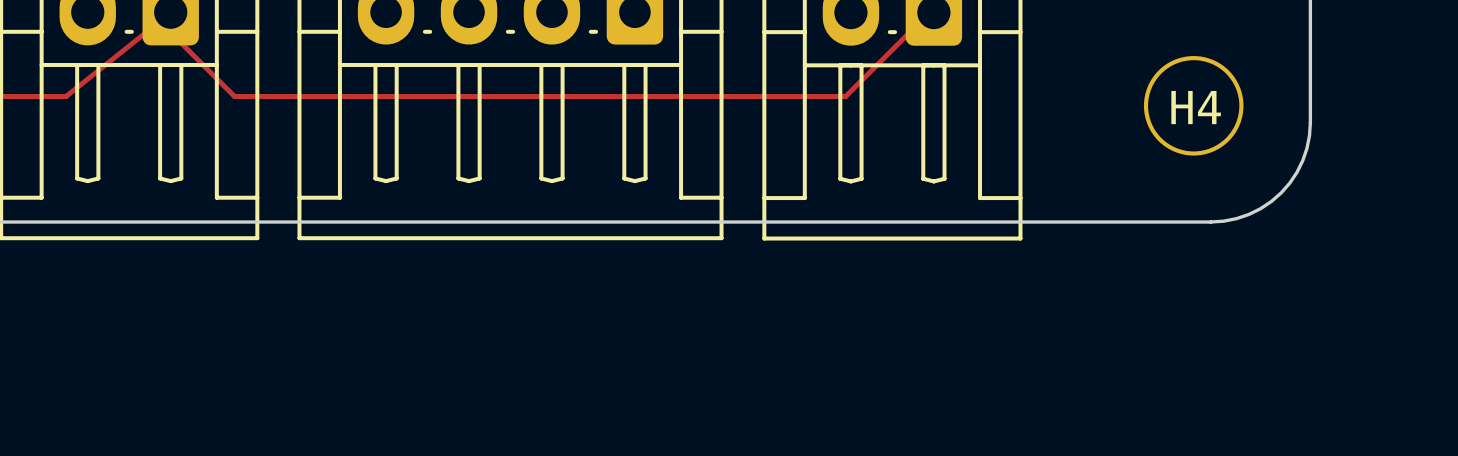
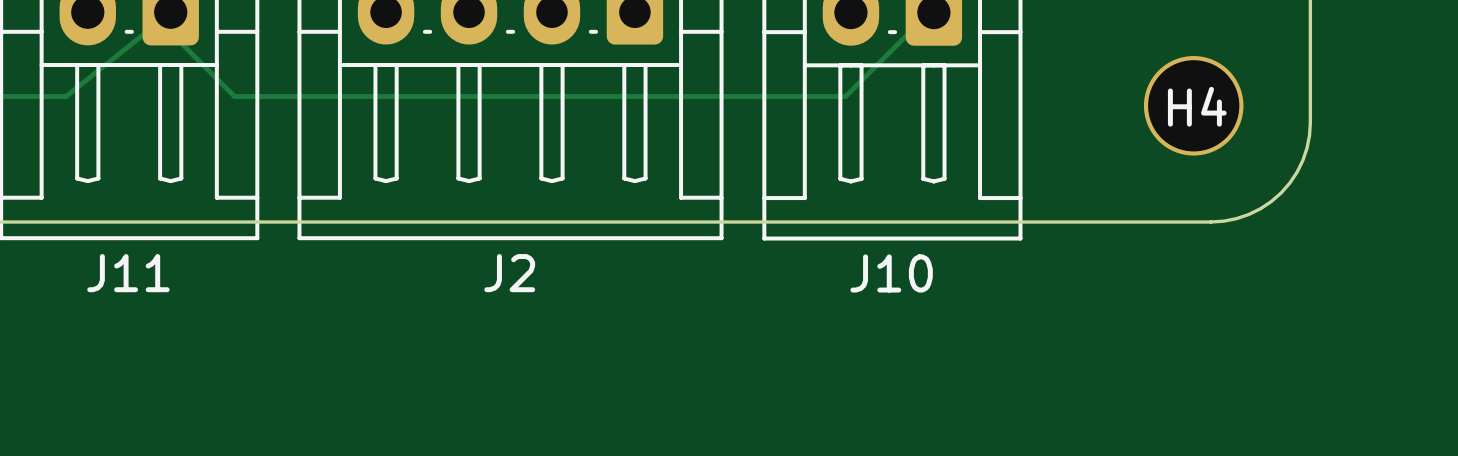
J11 name: none -> J11 (128, 273)
J2 name: none -> J2 (509, 273)
J10 name: none -> J10 (891, 273)

